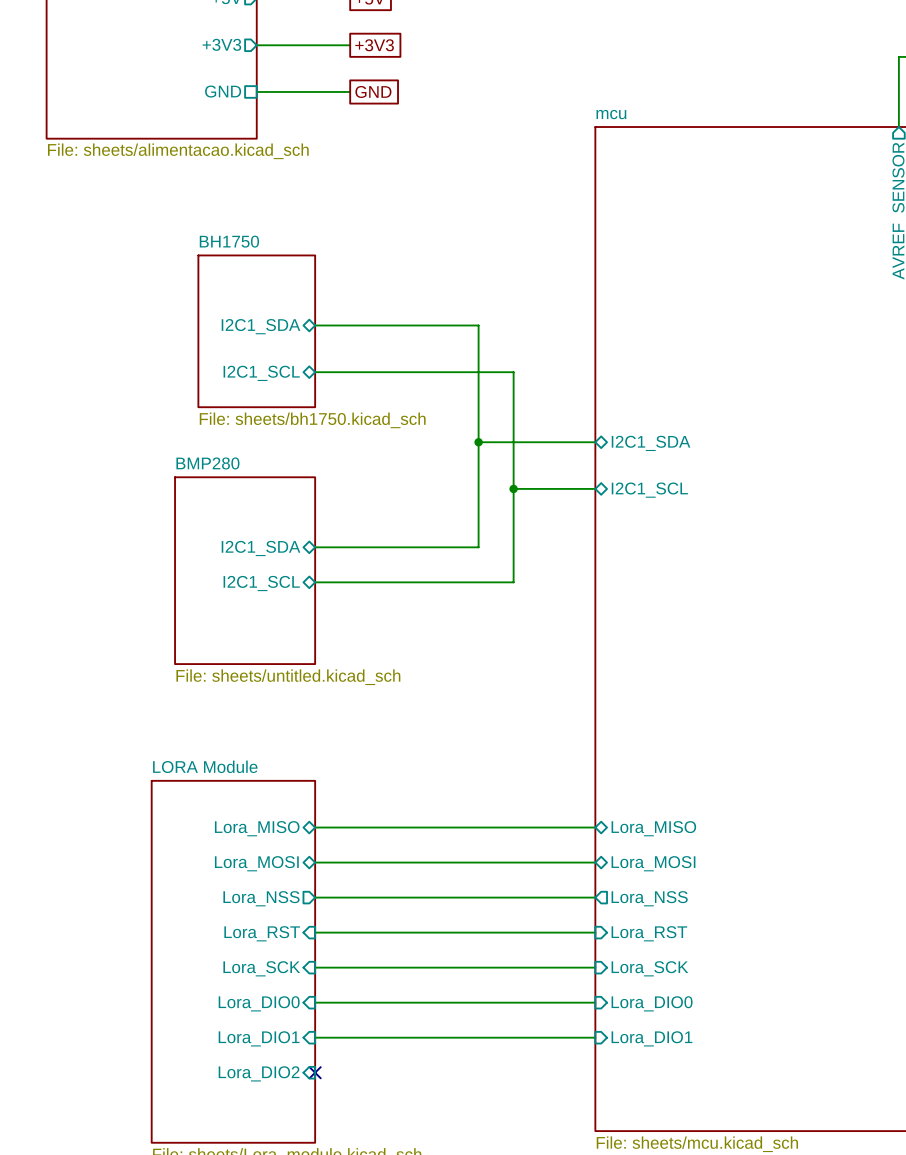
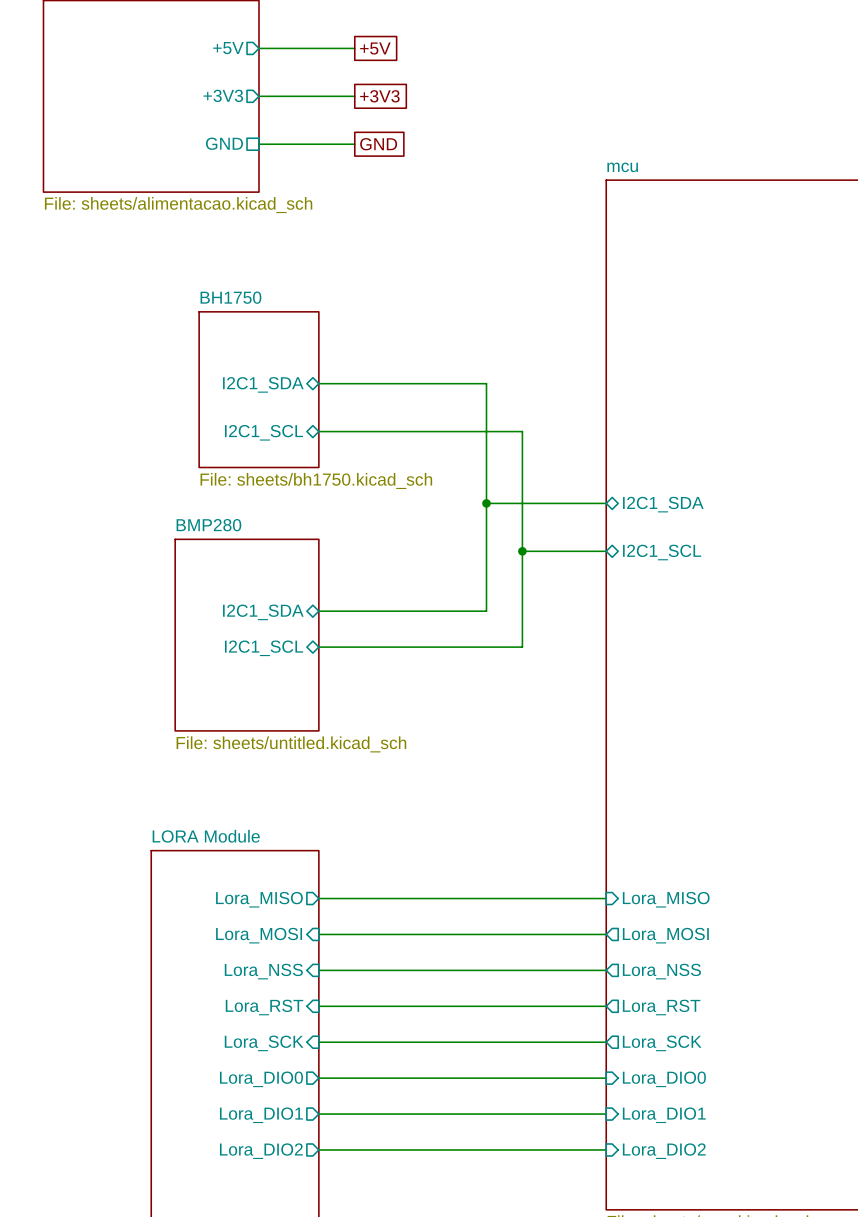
sheet pin shape: bidirectional (257, 828) -> output (259, 899)
sheet pin shape: bidirectional (653, 828) -> input (666, 899)
sheet pin shape: bidirectional (256, 863) -> input (259, 935)
sheet pin shape: bidirectional (653, 863) -> output (665, 935)
sheet pin shape: output (261, 898) -> input (263, 971)
sheet pin shape: input (649, 933) -> output (661, 1007)
sheet pin shape: input (649, 968) -> output (662, 1043)
sheet pin shape: input (259, 1003) -> output (261, 1079)
sheet pin shape: input (259, 1038) -> output (261, 1115)
wire: none -> (318, 1149) (606, 1149)
no-connect mark: (315, 1072) -> none
sheet pin shape: input (259, 1073) -> output (261, 1151)
sheet pin: none -> Lora_DIO2 (664, 1151)

